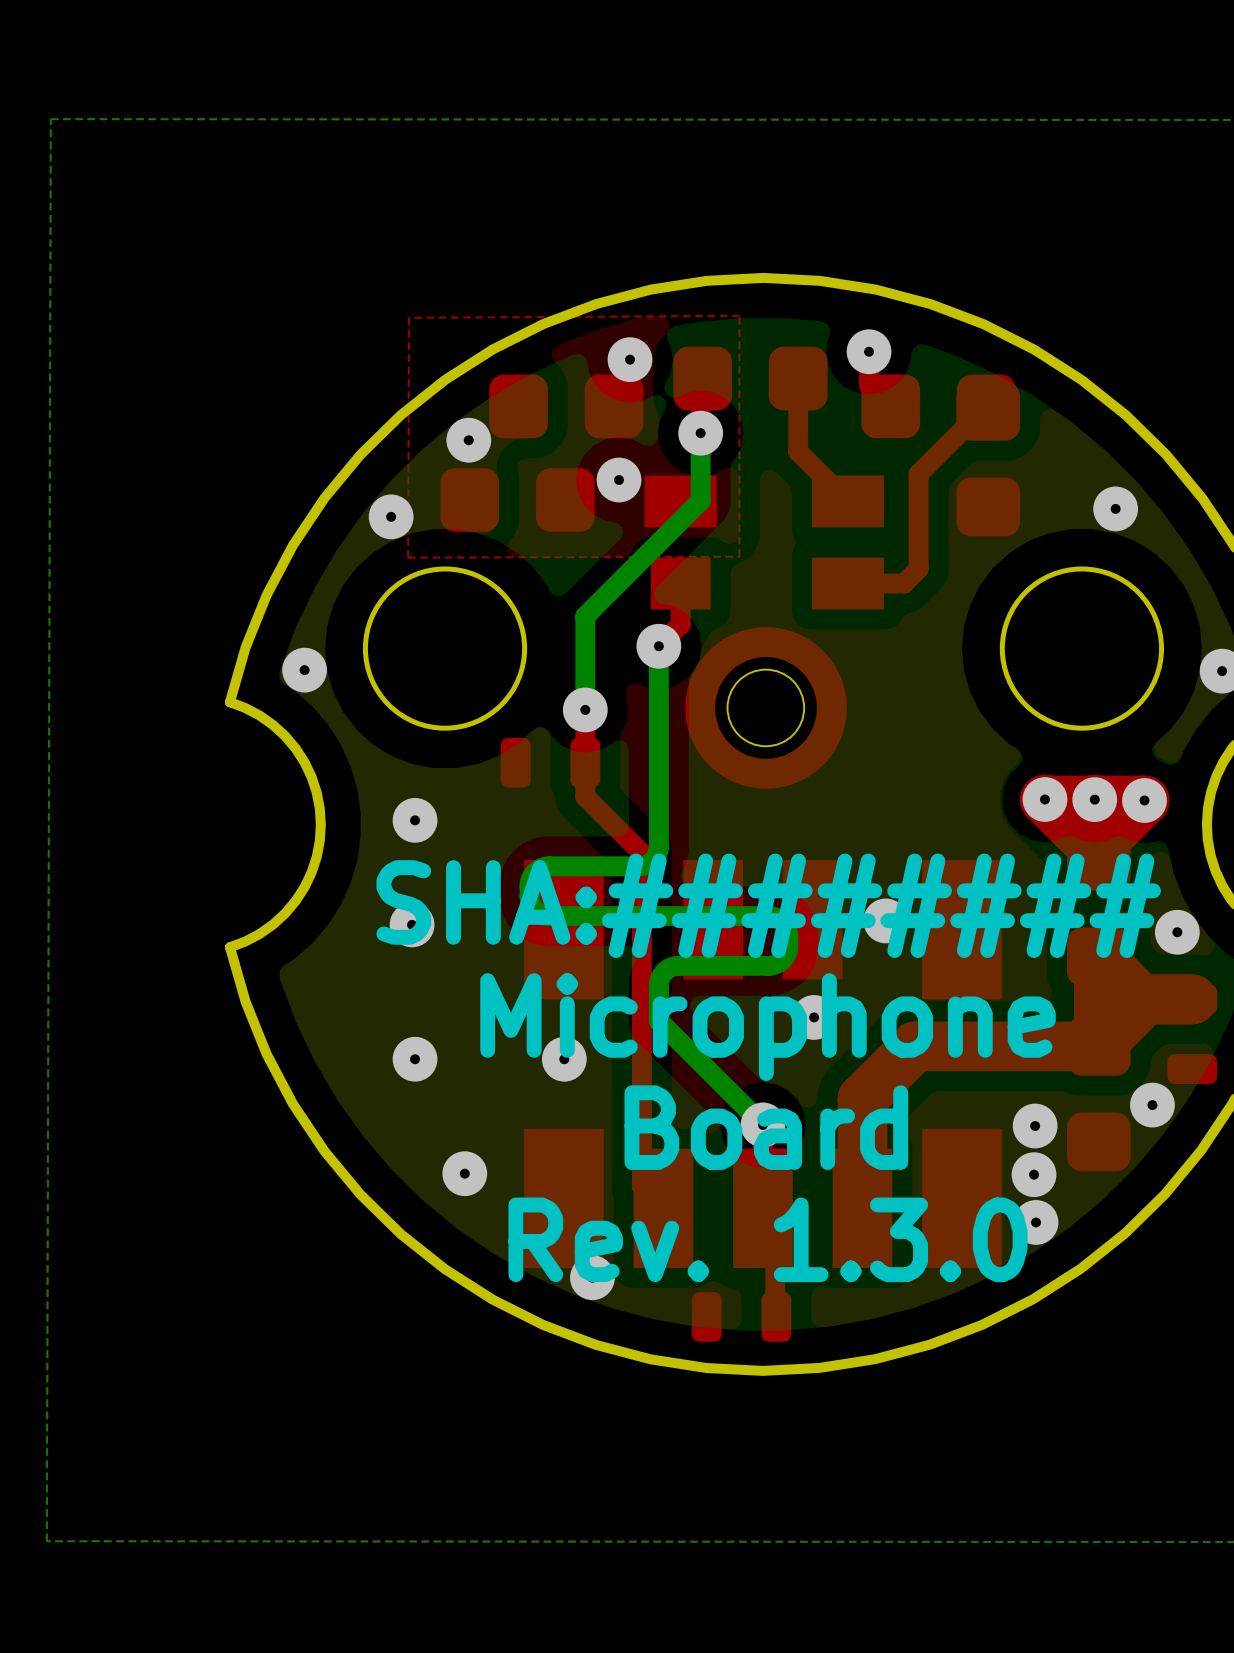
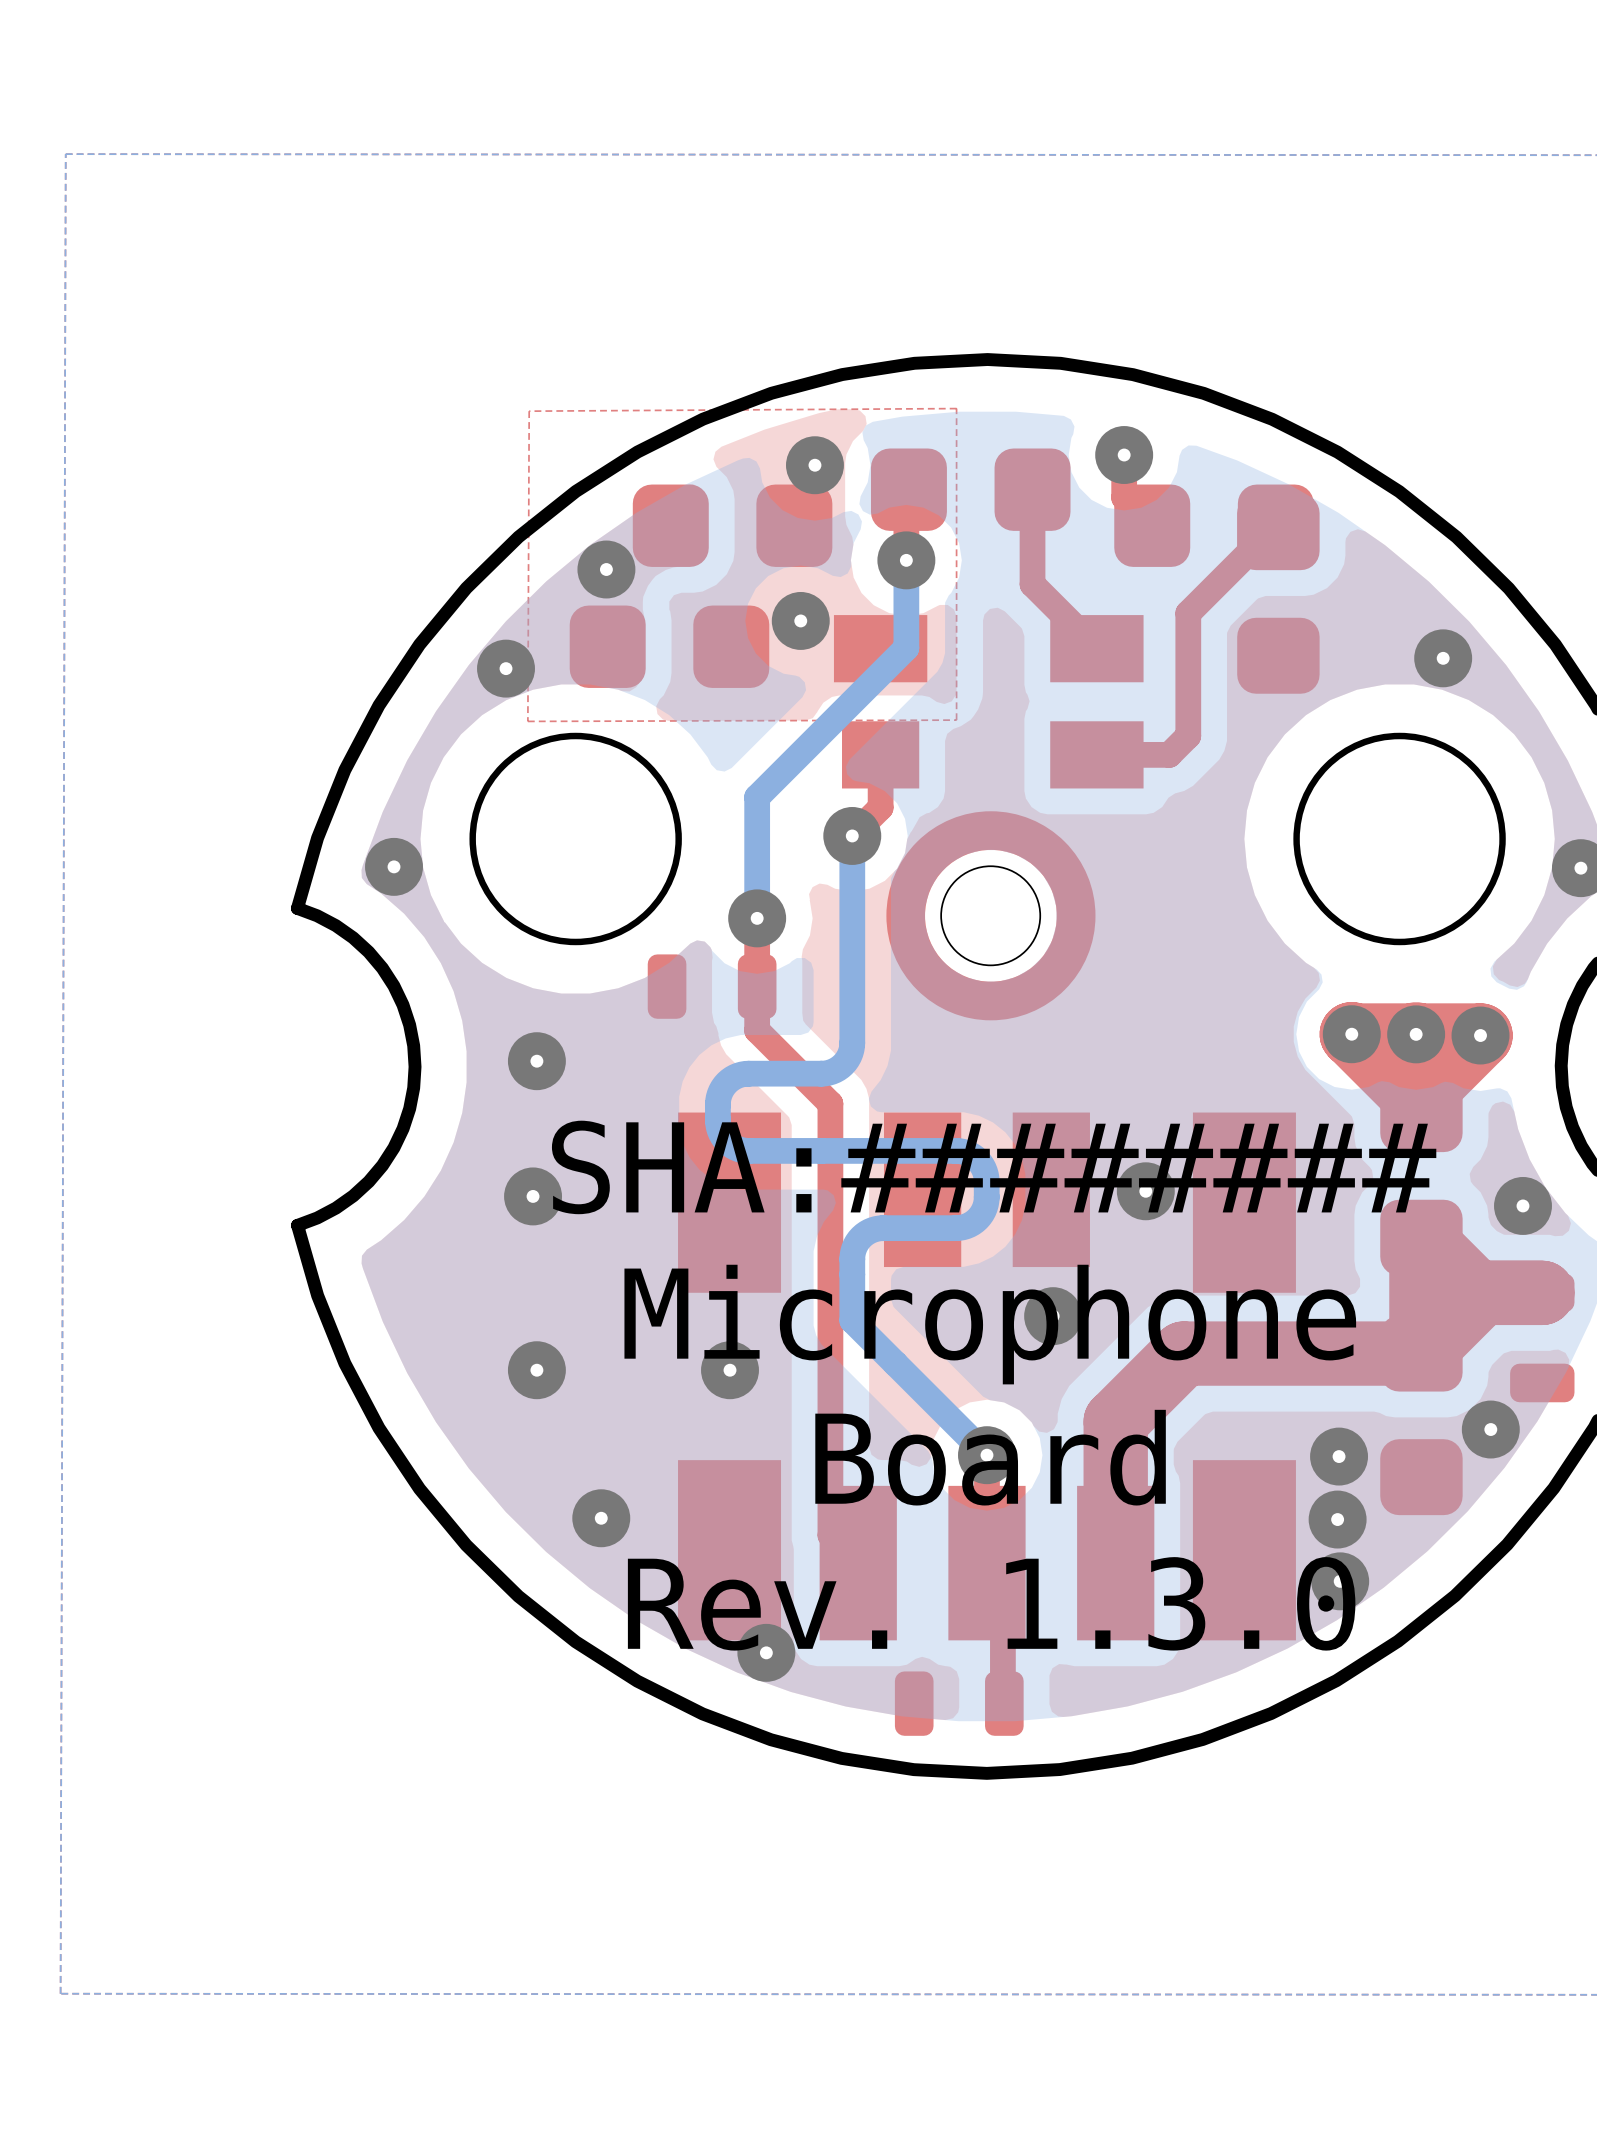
bottom track: (658, 806) (658, 849) (656, 856) (648, 863) (638, 866) (546, 866) (539, 868) (533, 874) (529, 886) (532, 906) (537, 911) (546, 915) (768, 916) (780, 920) (786, 928) (787, 951) (784, 958) (775, 964) (676, 966) (664, 971) (660, 978) (658, 985) -> (852, 1042) (850, 1052) (845, 1062) (831, 1071) (821, 1073) (745, 1073) (729, 1080) (722, 1088) (718, 1101) (718, 1126) (724, 1139) (735, 1147) (748, 1150) (959, 1151) (972, 1155) (979, 1162) (984, 1171) (986, 1181) (984, 1207) (977, 1219) (969, 1225) (955, 1228) (879, 1228) (866, 1232) (859, 1239) (854, 1248) (852, 1275)

